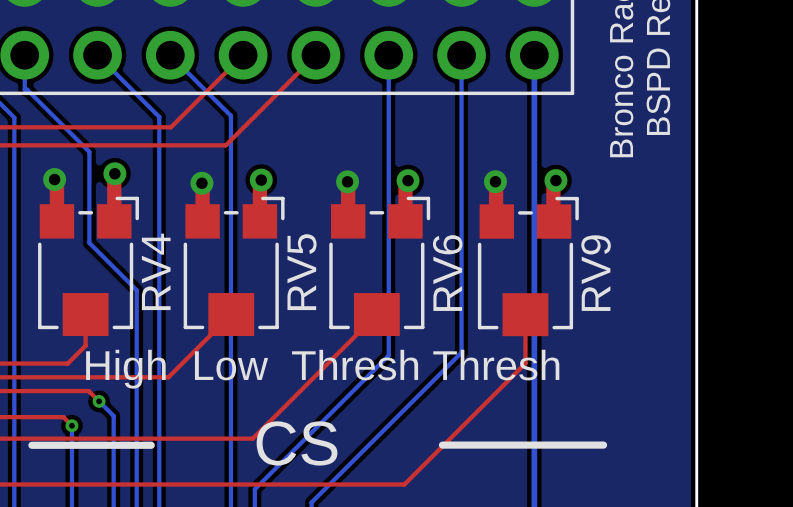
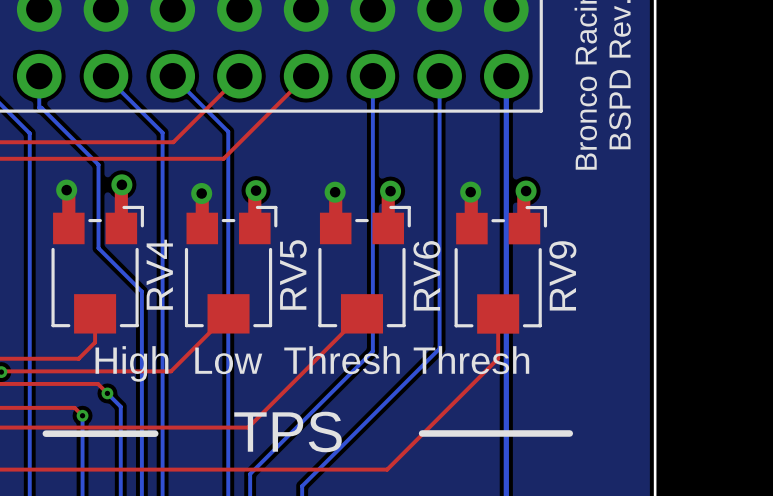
text: CS (297, 443) -> TPS (288, 432)

